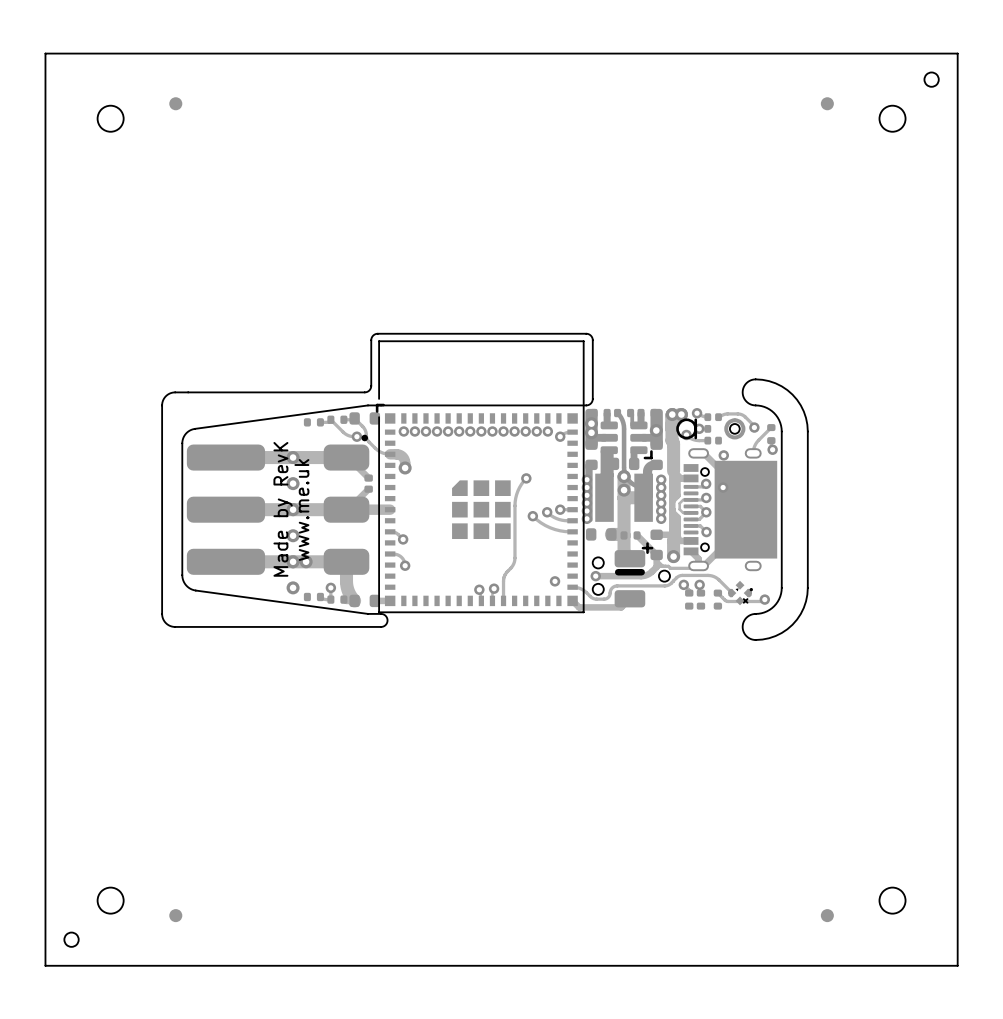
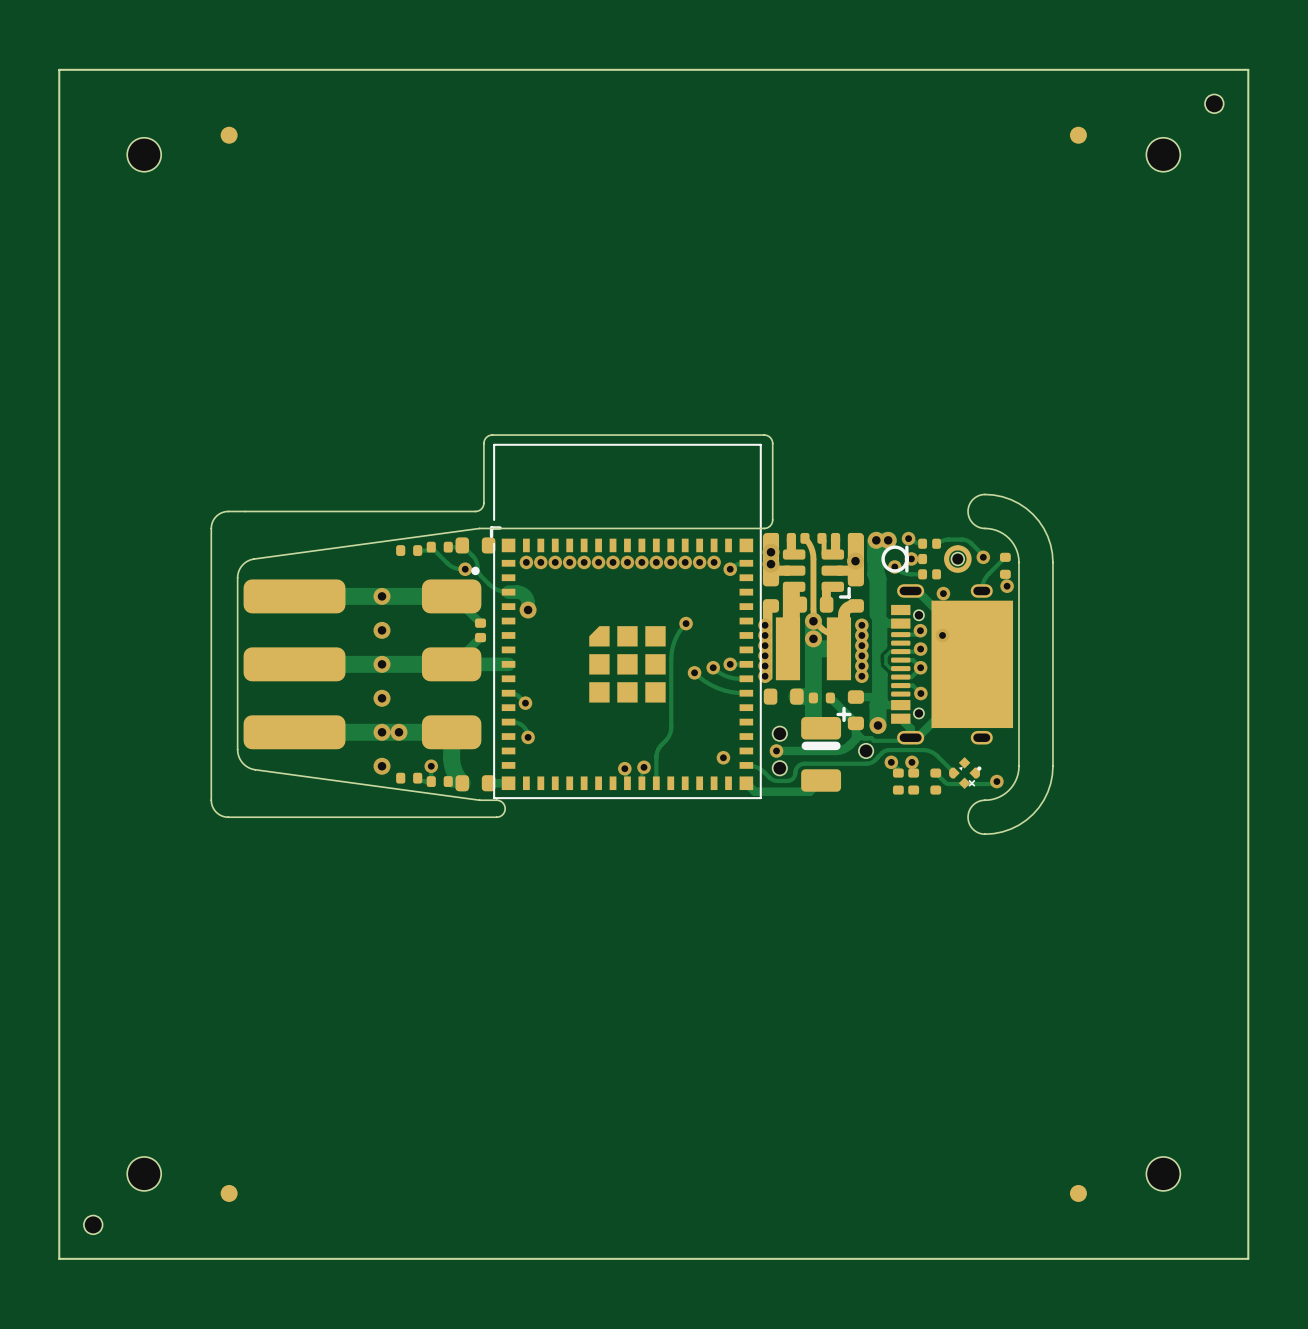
text: Made by RevK (283, 509) -> none
text: www.me.uk (301, 509) -> none

